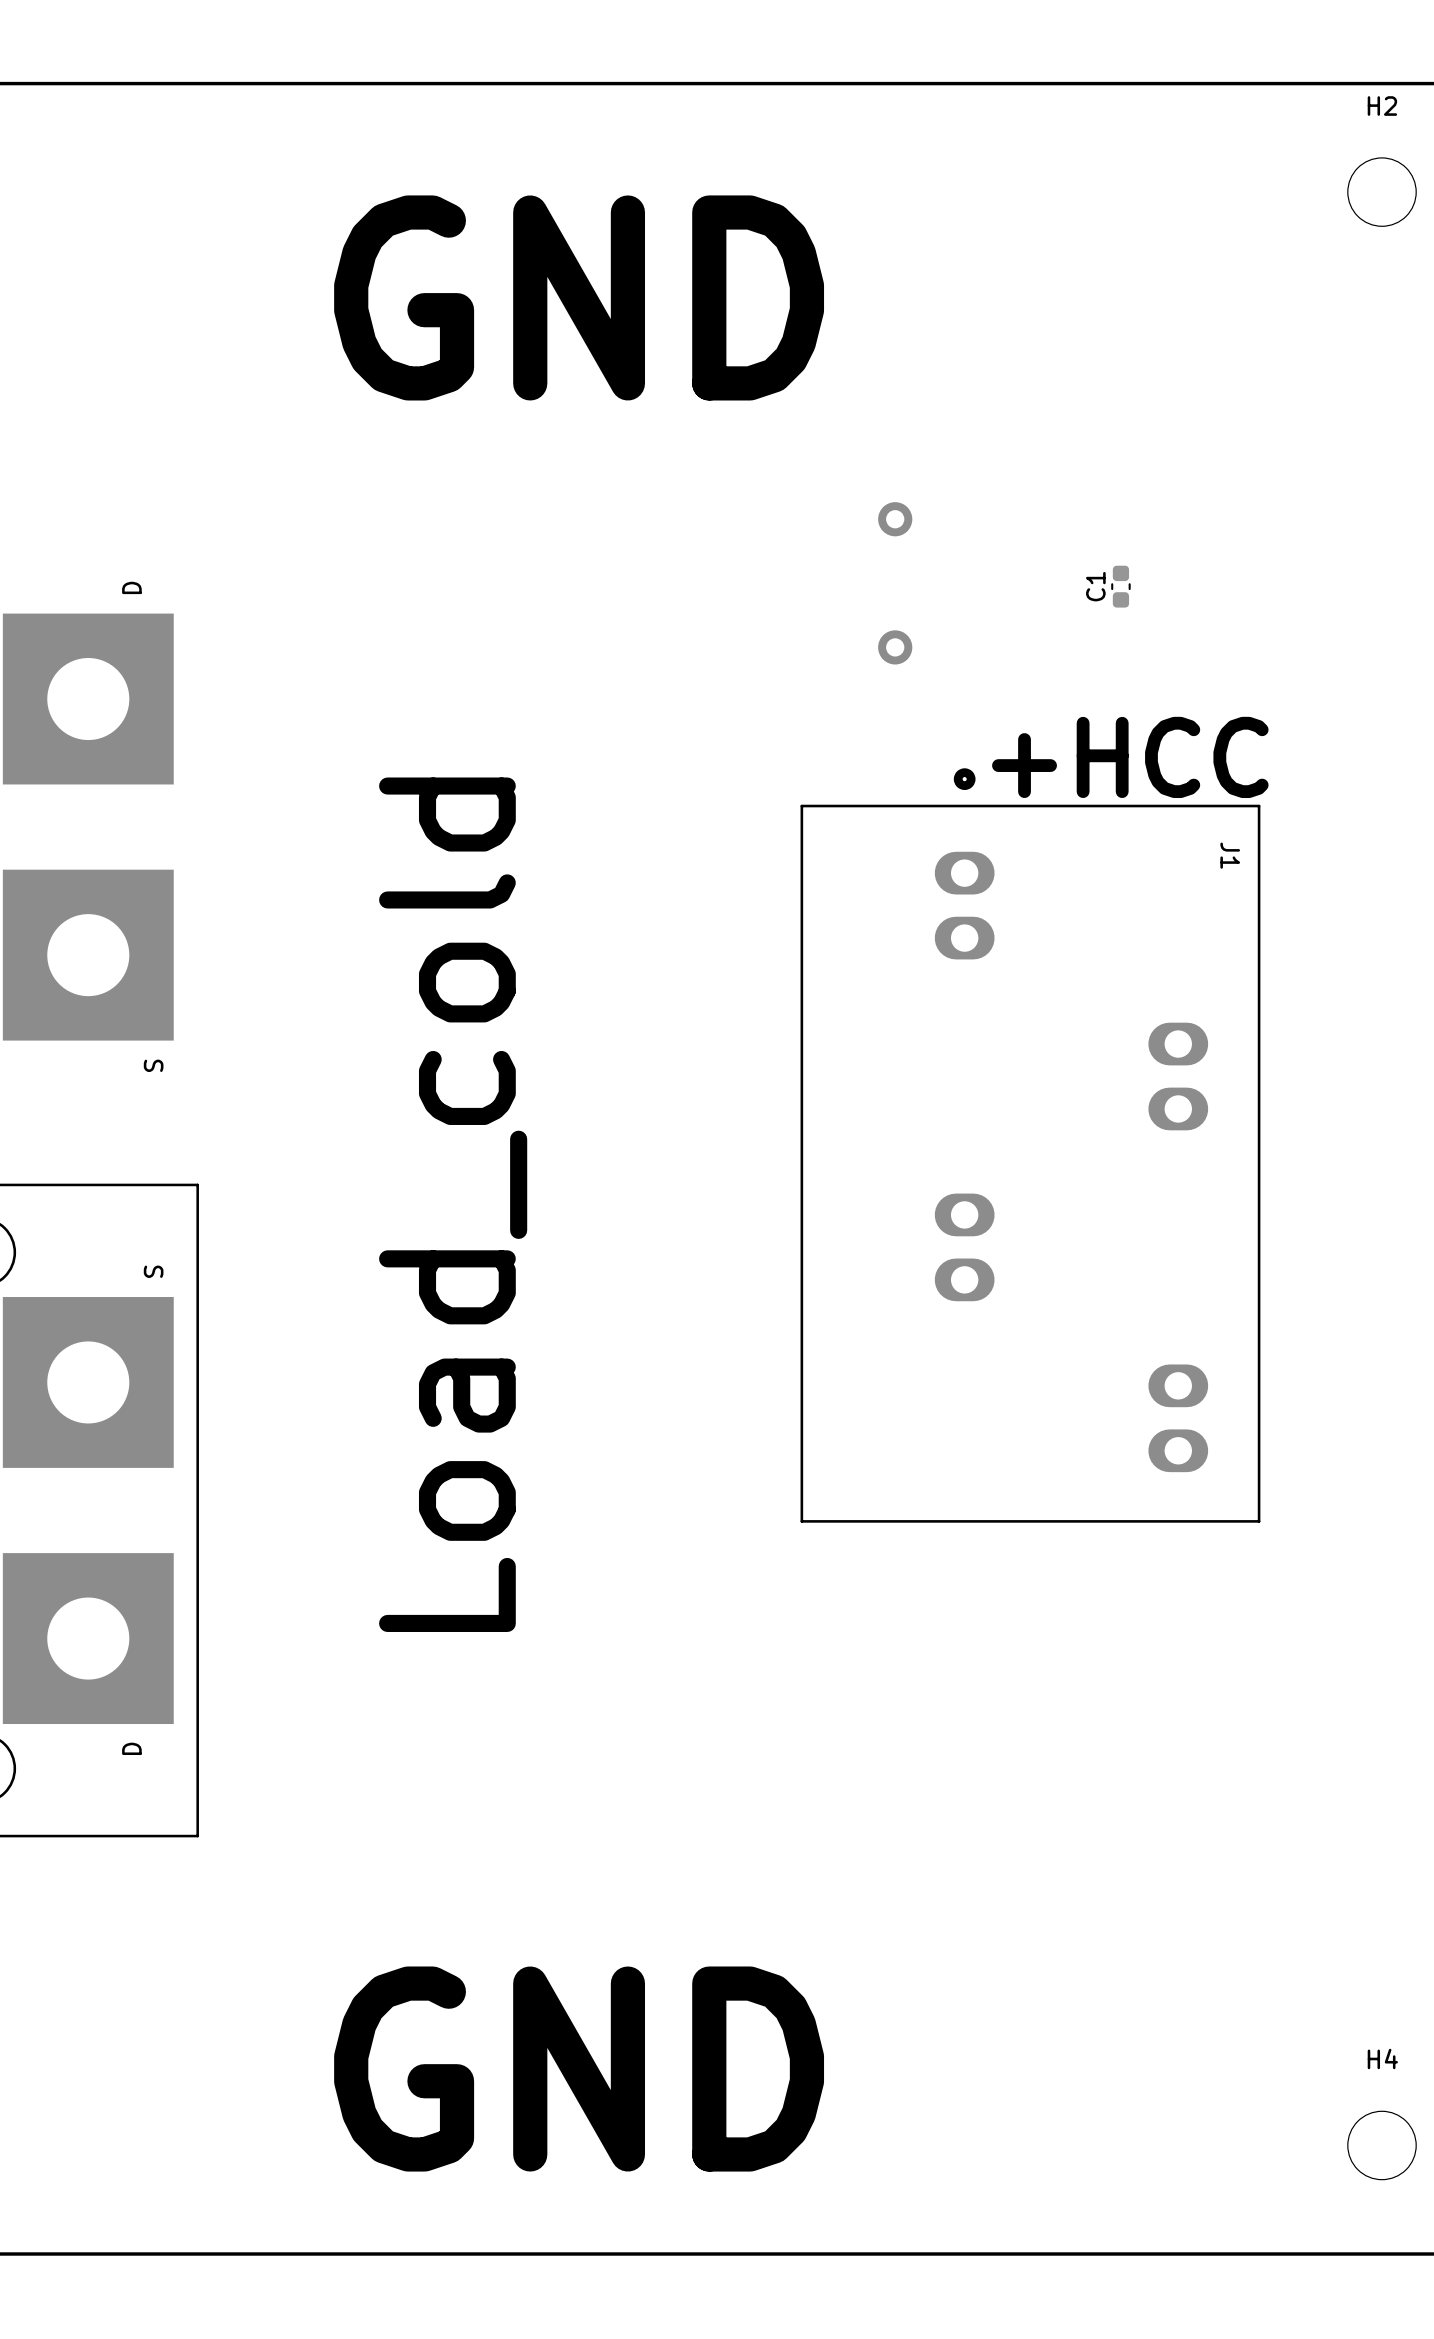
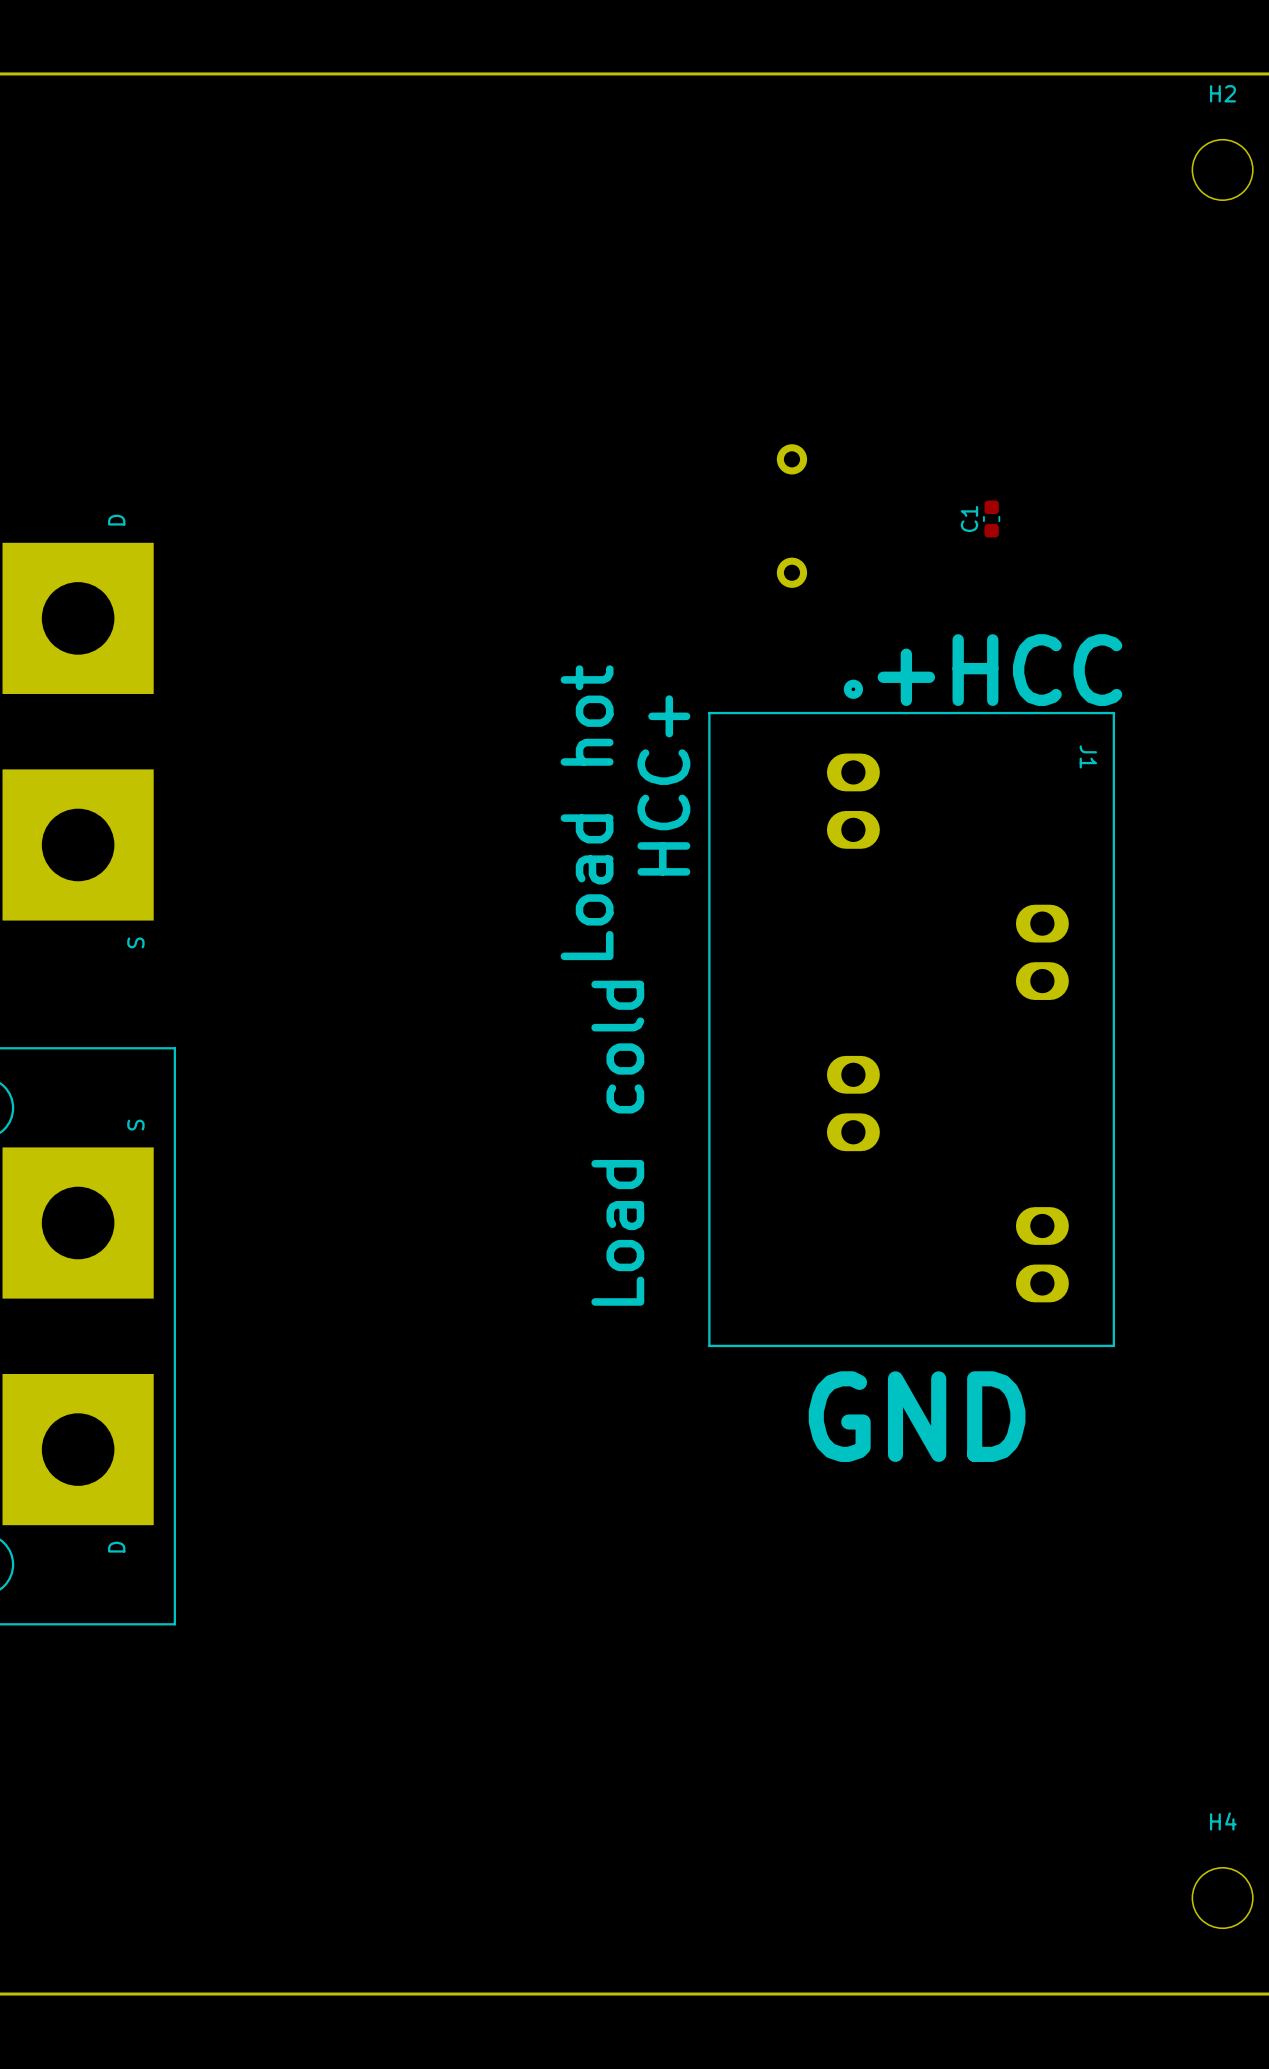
text: GND (579, 297) -> none
text: none -> HCC+ (663, 785)
text: none -> Load hot (587, 812)
text: Load_cold (453, 1204) -> none
text: none -> Load cold (617, 1143)
text: none -> GND (917, 1416)
text: GND (579, 2069) -> none

